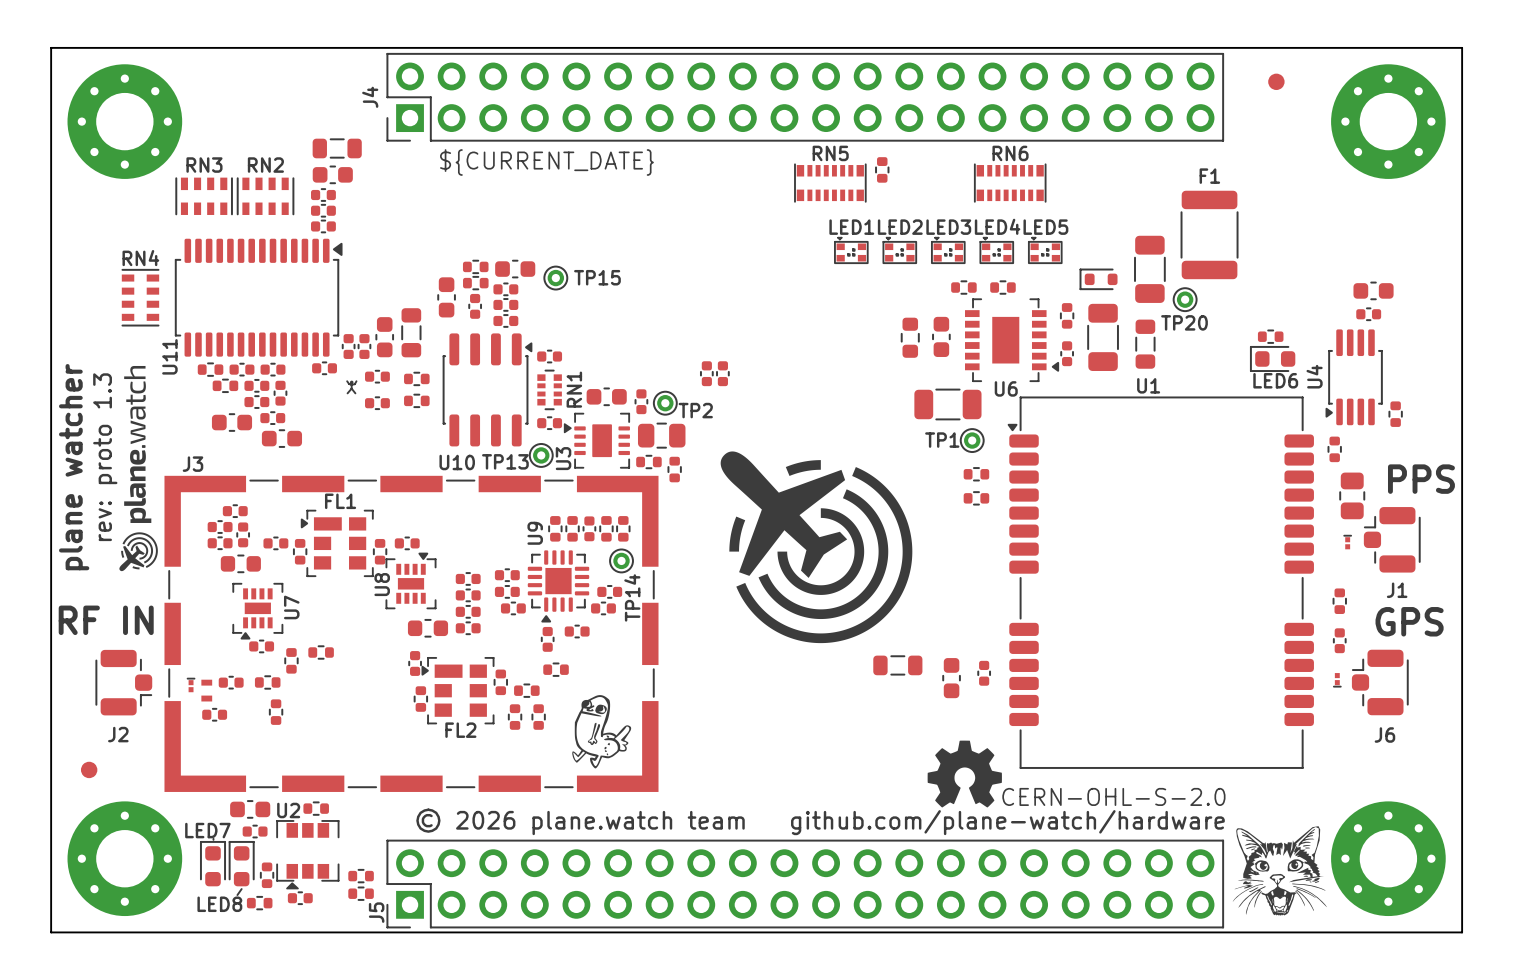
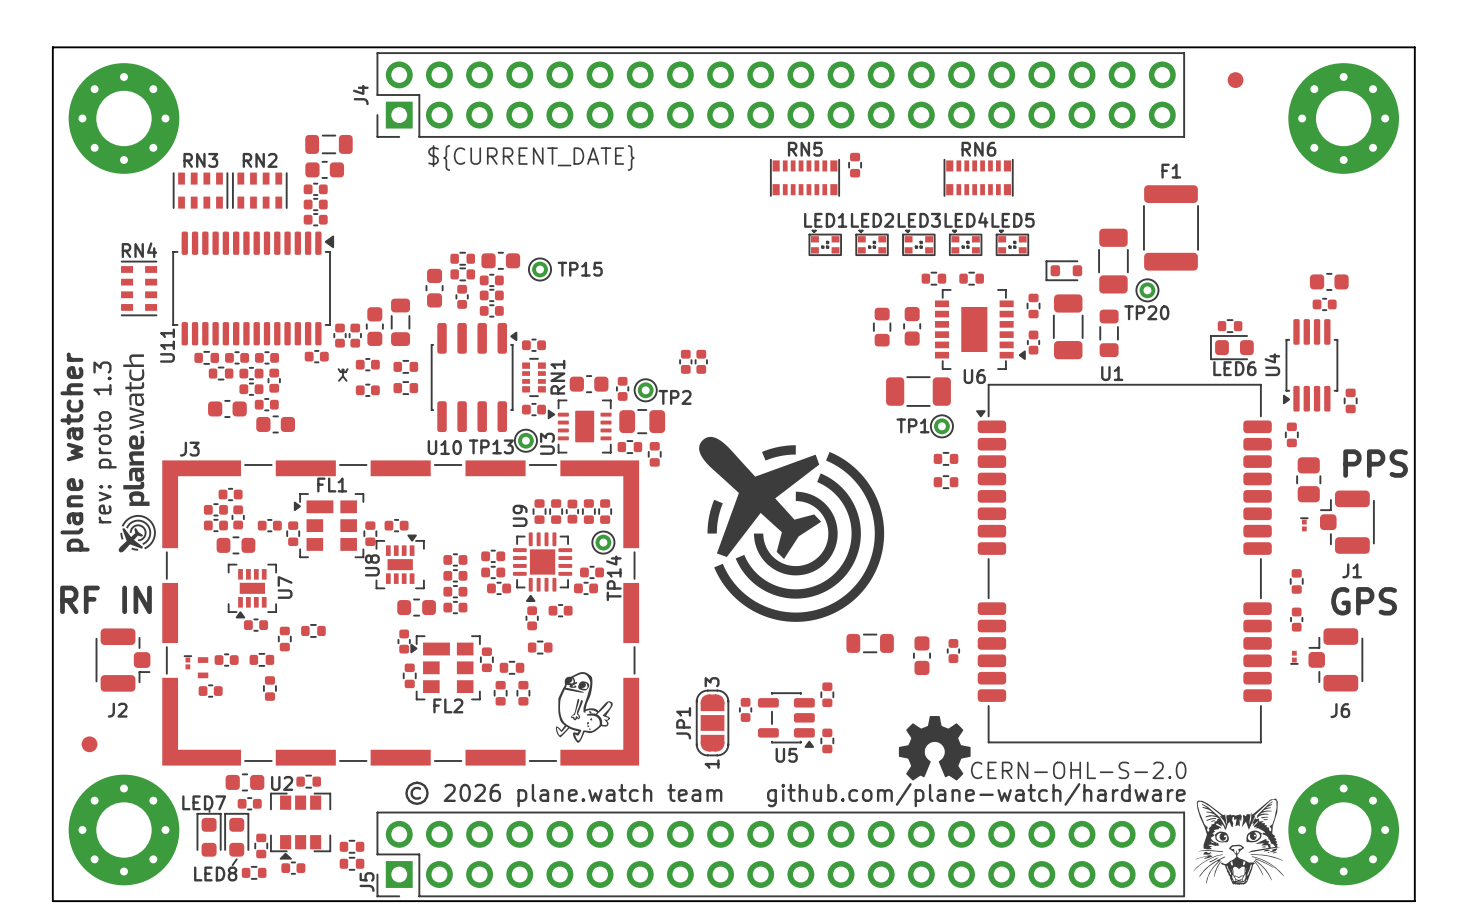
part: none -> (827, 694)
part: none -> (745, 709)
U5: none -> (786, 720)
JP1: none -> (712, 722)
part: none -> (827, 740)

